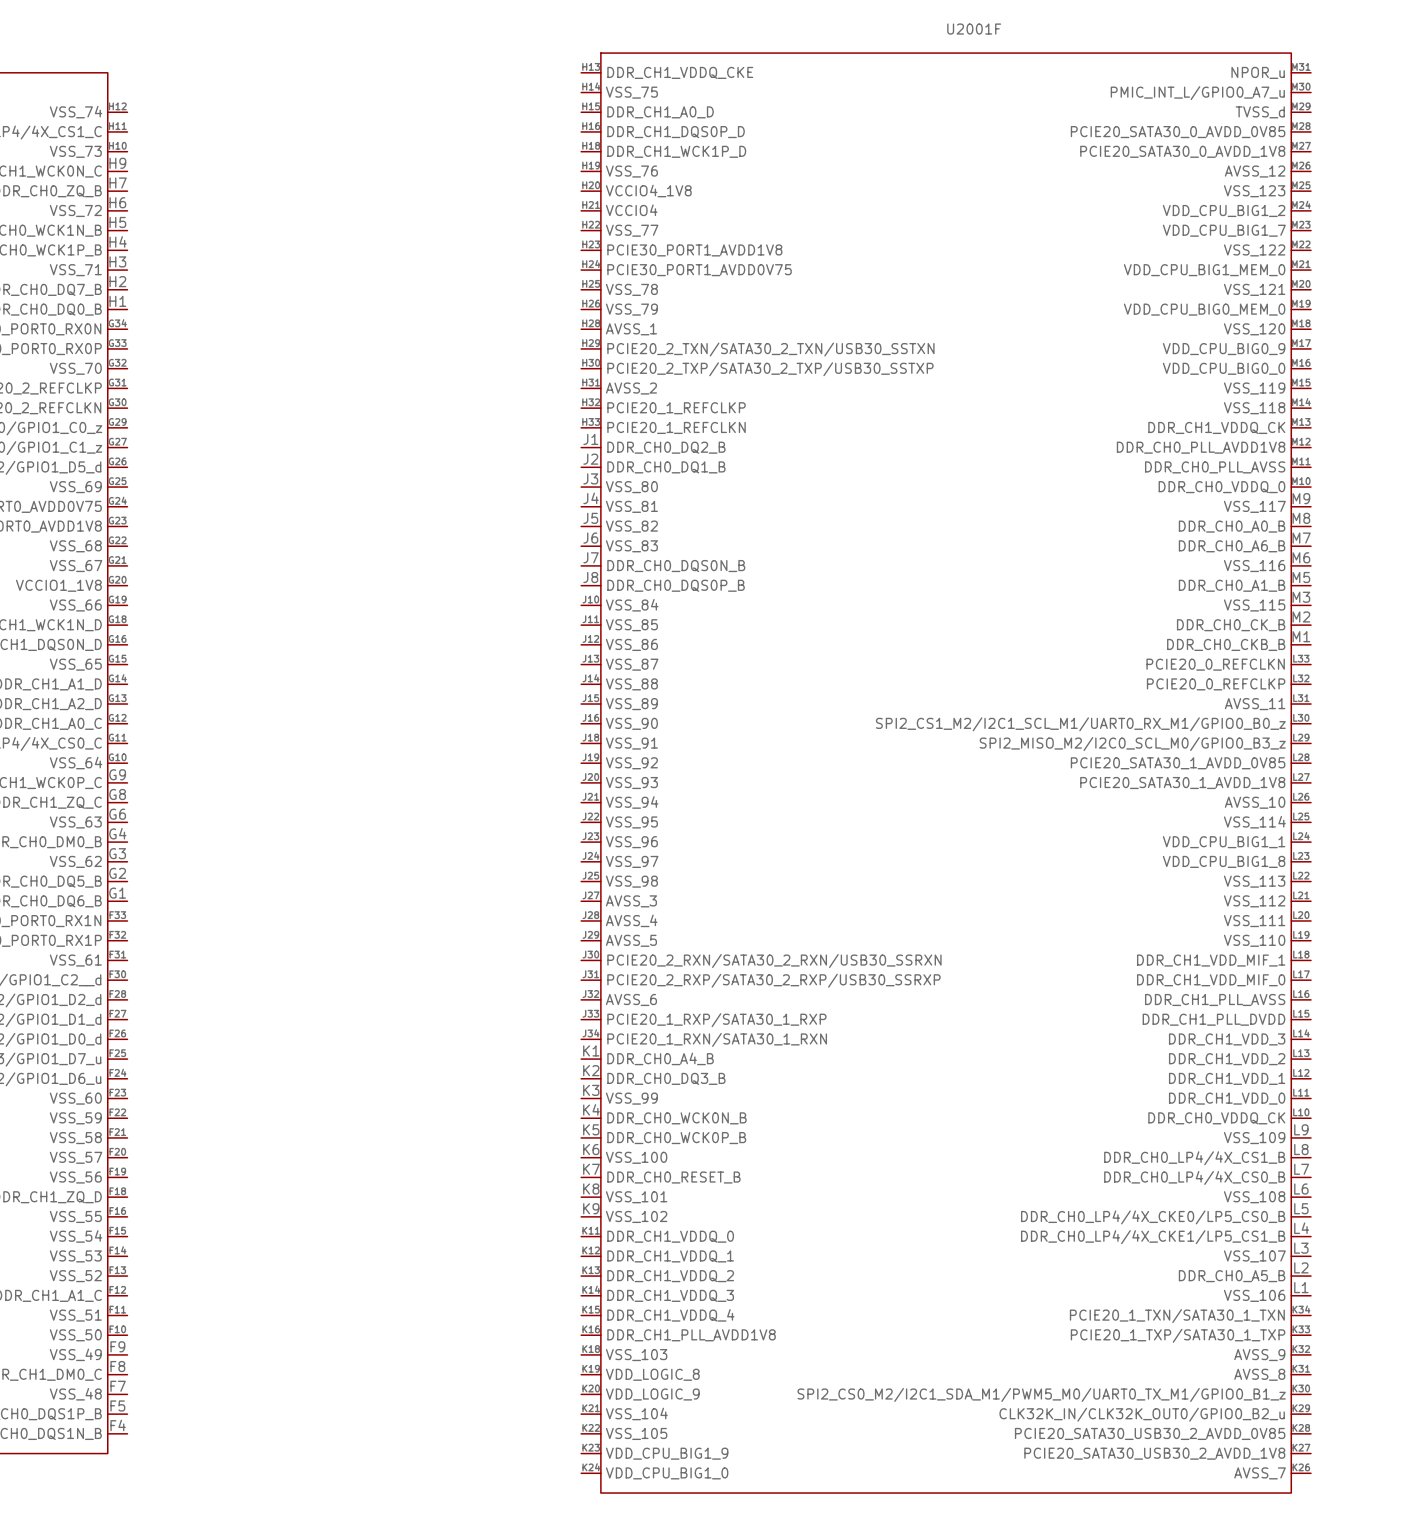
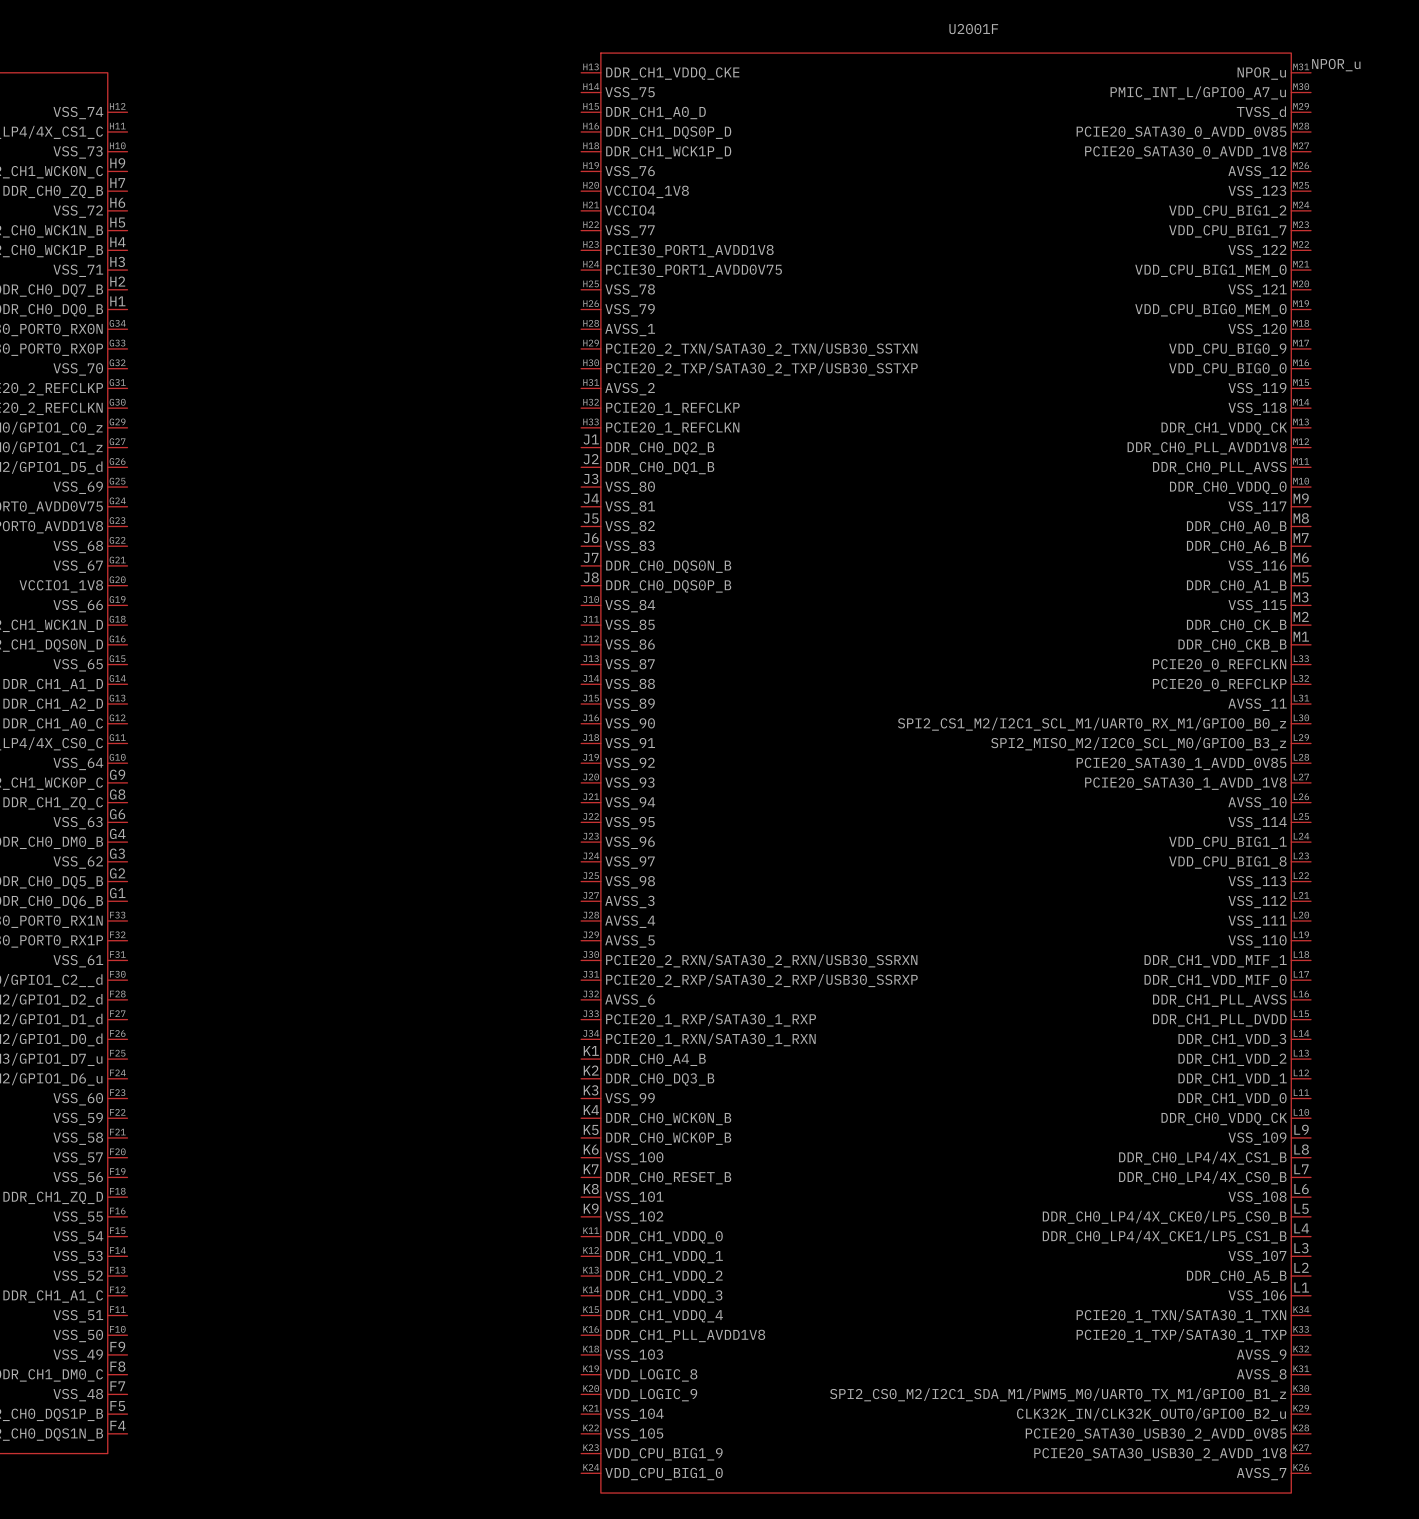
label: none -> NPOR_u (1336, 65)

